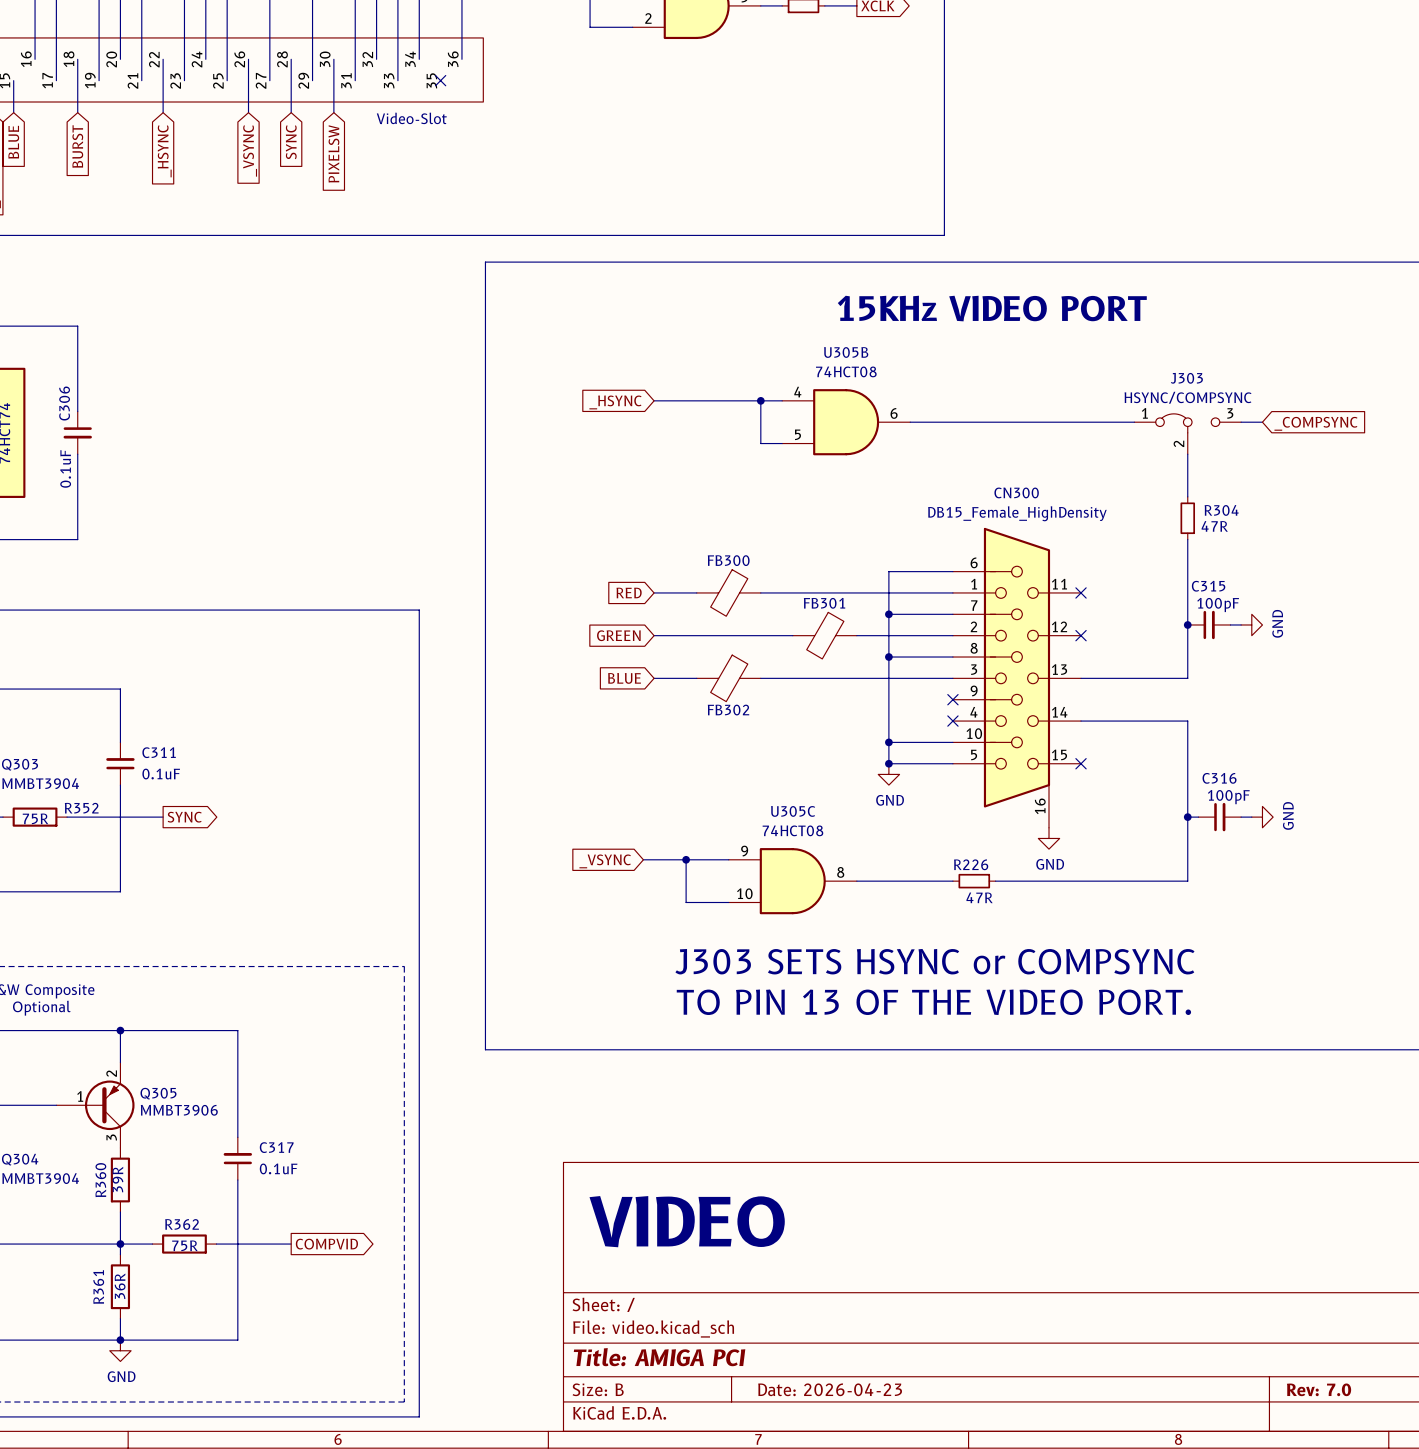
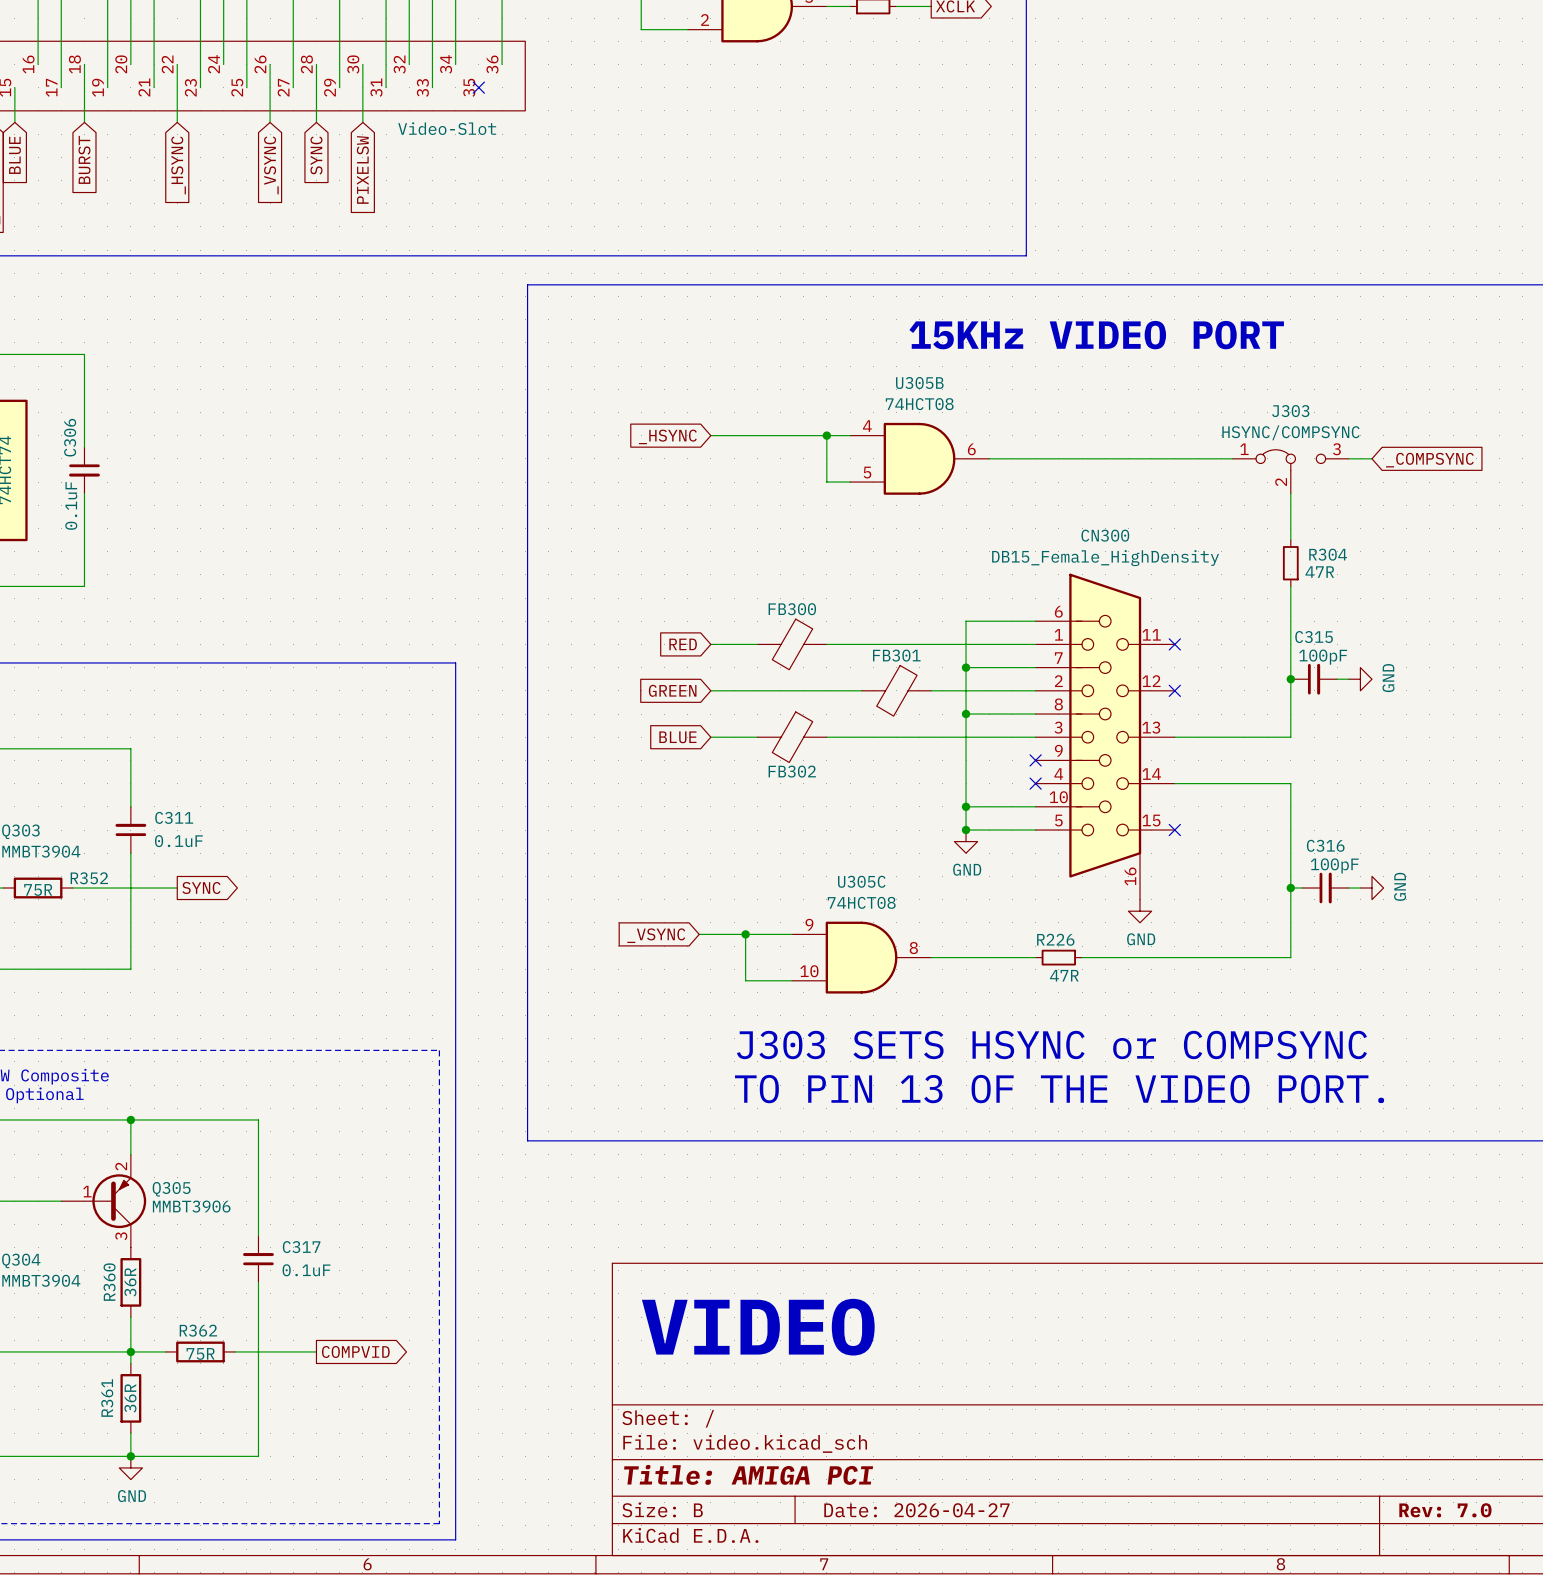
R360 value: 39R (117, 1179) -> 36R (130, 1282)
title block: Date: 2026-04-23 (830, 1389) -> Date: 2026-04-27 (916, 1510)

